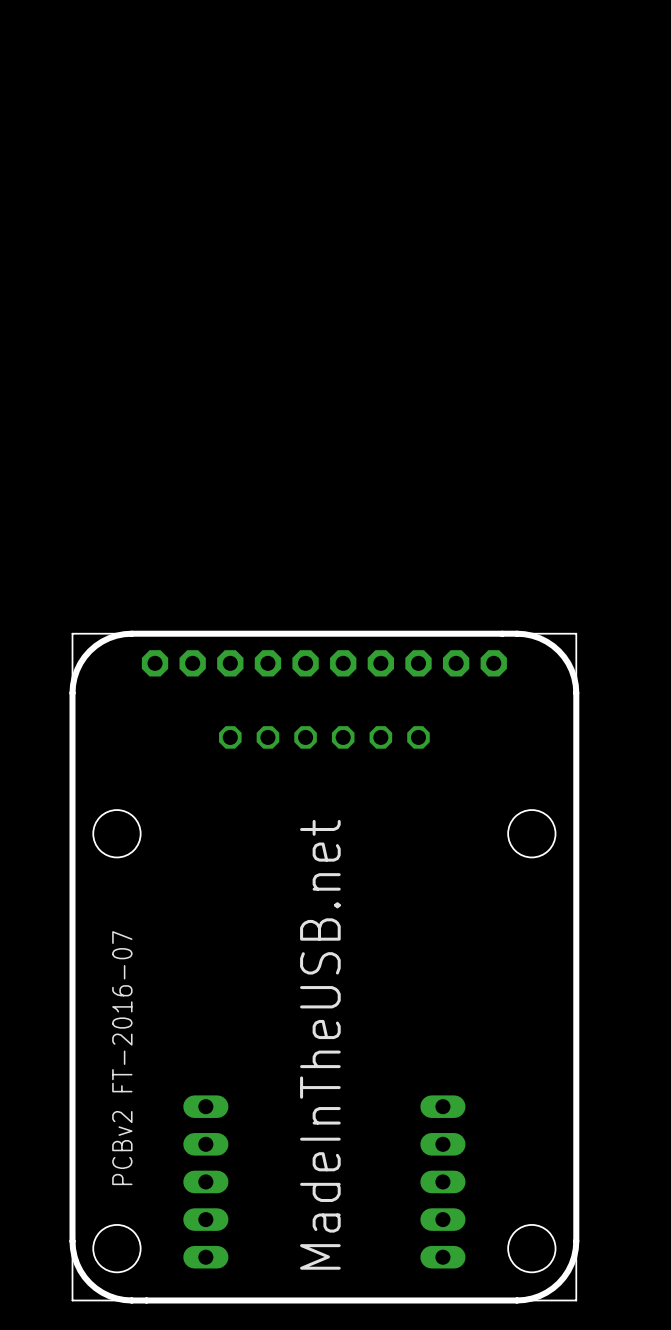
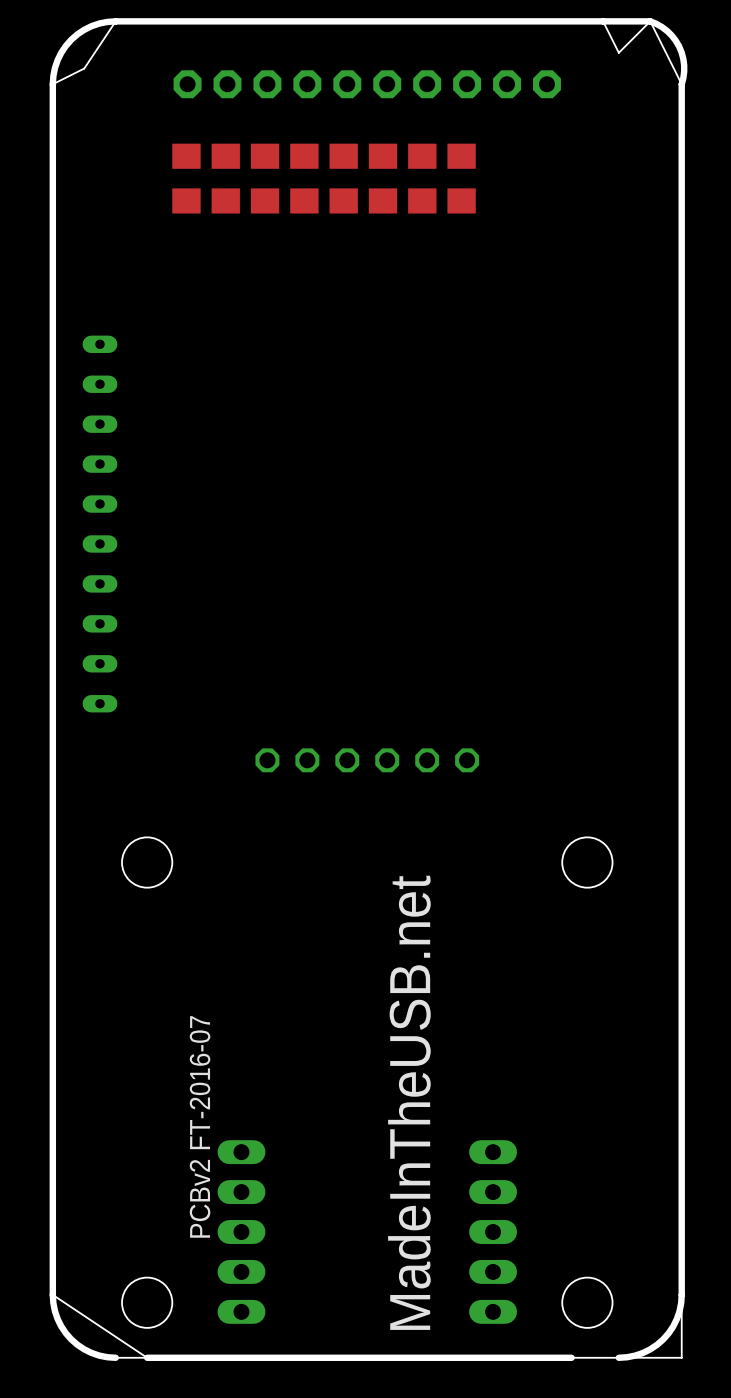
board edge: none -> (115, 21) (84, 68) (52, 84)
board edge: none -> (115, 21) (91, 26) (71, 39) (57, 60) (52, 84)
board edge: none -> (650, 21) (618, 52) (603, 21)
board edge: none -> (650, 21) (681, 84)
board edge: none -> (650, 21) (115, 21)
board edge: none -> (650, 21) (667, 30) (679, 46) (684, 65) (681, 84)
board edge: none -> (52, 84) (52, 1294)
part: none -> (367, 84)
board edge: none -> (681, 84) (681, 1294)
part: none -> (186, 178)
part: none -> (225, 178)
part: none -> (265, 178)
part: none -> (304, 178)
part: none -> (343, 178)
part: none -> (383, 178)
part: none -> (422, 178)
part: none -> (461, 178)
part: none -> (99, 524)
board edge: (131, 633) (72, 633) (72, 692) -> none
board edge: (131, 633) (524, 634) (546, 641) (558, 651) (571, 670) (576, 692) -> none
board edge: (131, 633) (109, 638) (89, 651) (77, 670) (72, 692) -> none
board edge: (502, 633) (576, 633) (576, 692) -> none
part: (324, 663) -> none
board edge: (72, 692) (72, 1241) -> none
board edge: (576, 692) (576, 1241) -> none
text position: MadeInTheUSB.net (320, 1044) -> MadeInTheUSB.net (409, 1102)
text position: PCBv2 FT-2016-07 (122, 1058) -> PCBv2 FT-2016-07 (200, 1126)
board edge: (72, 1241) (72, 1300) (87, 1300) -> (52, 1294) (57, 1318) (71, 1339) (91, 1353) (115, 1357)
board edge: (72, 1241) (77, 1263) (89, 1283) (109, 1295) (131, 1300) -> (52, 1294) (147, 1357) (162, 1357)
board edge: (576, 1241) (576, 1300) -> (681, 1294) (681, 1357) (634, 1357)
board edge: (576, 1241) (571, 1263) (558, 1283) (539, 1295) (517, 1300) -> (681, 1294) (676, 1318) (663, 1339) (642, 1353) (618, 1357)

